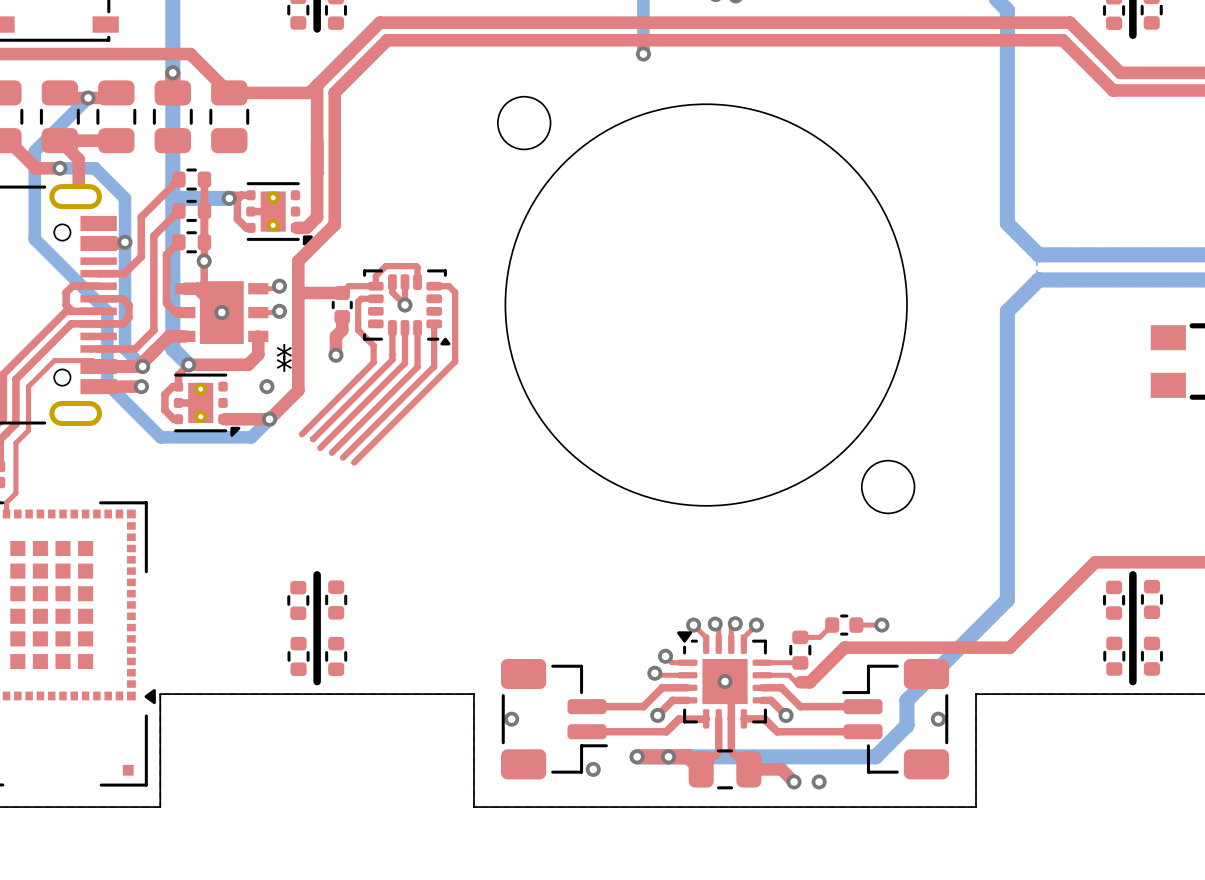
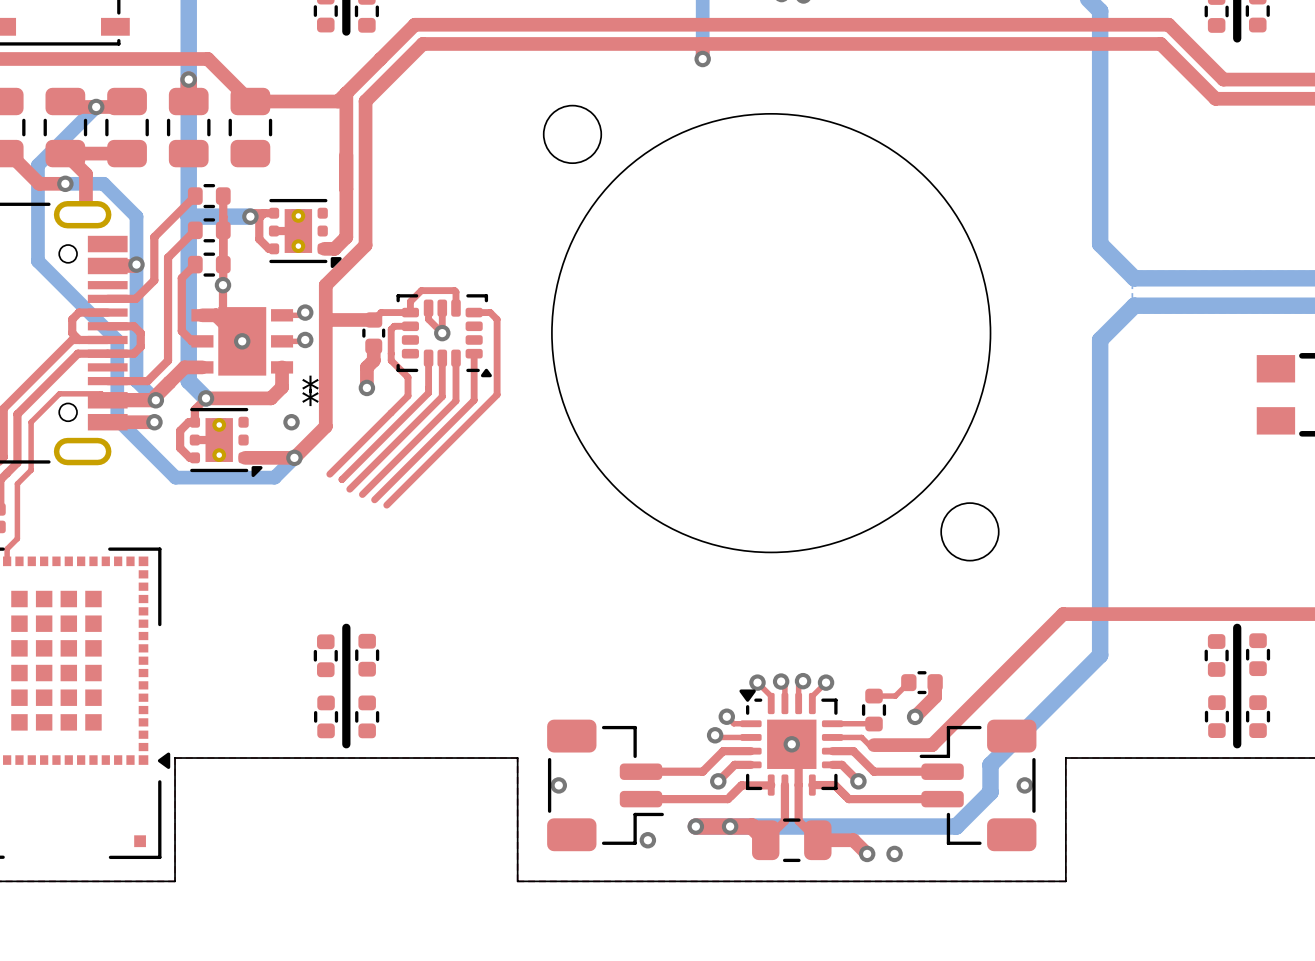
top track: (1095, 562) (1009, 647) (844, 647) (809, 682) -> (1196, 614) (1063, 614) (932, 745) (884, 745)
top track: (856, 625) (881, 625) -> (935, 682) (935, 696) (915, 716)
via position: (881, 625) -> (915, 716)

